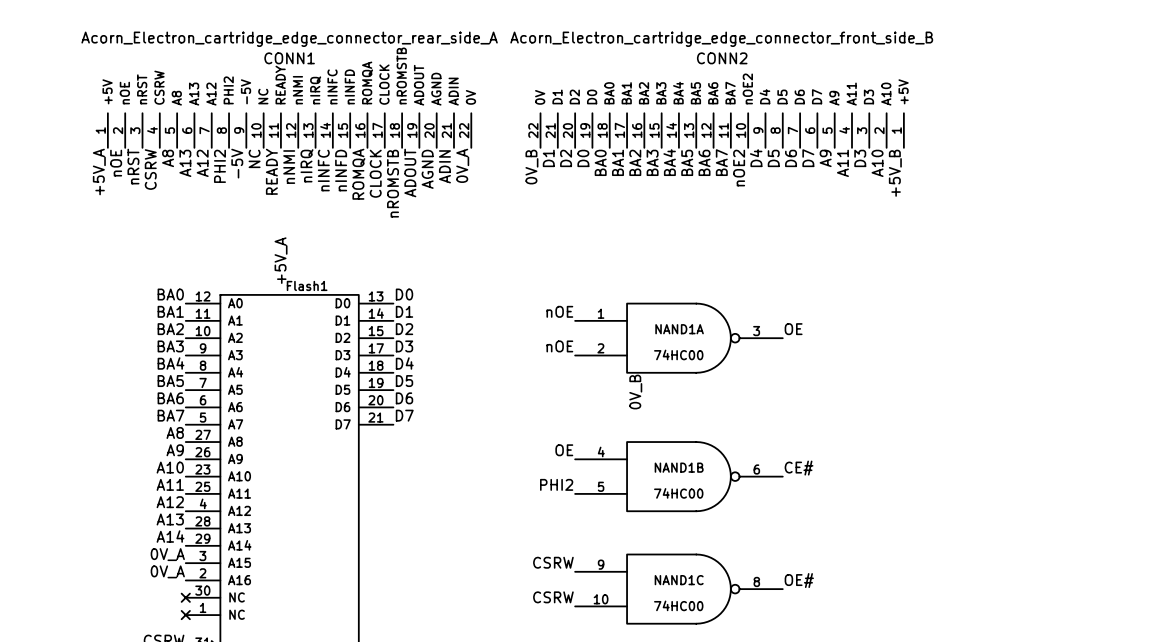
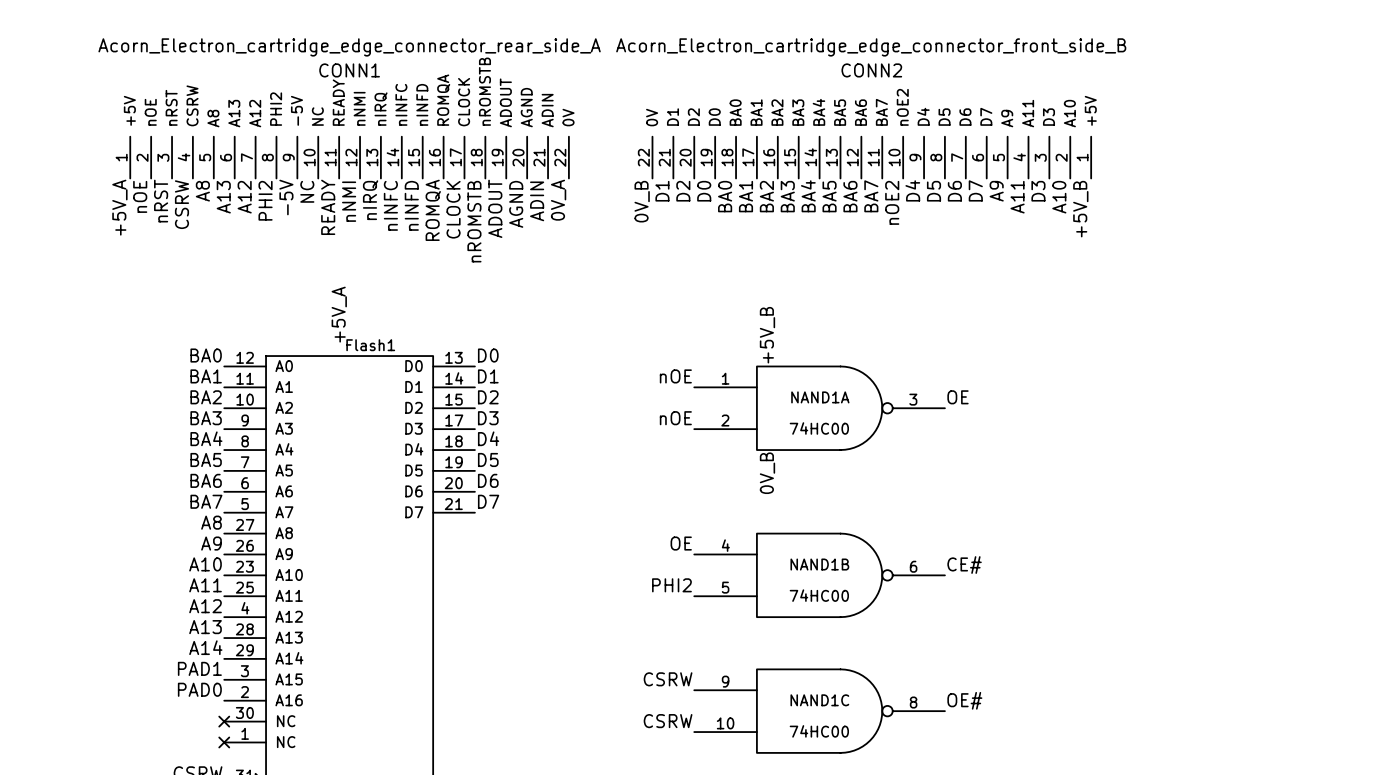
label: none -> +5V_B (767, 335)
label: 0V_A (167, 554) -> PAD1 (199, 668)
label: 0V_A (167, 571) -> PAD0 (199, 689)

